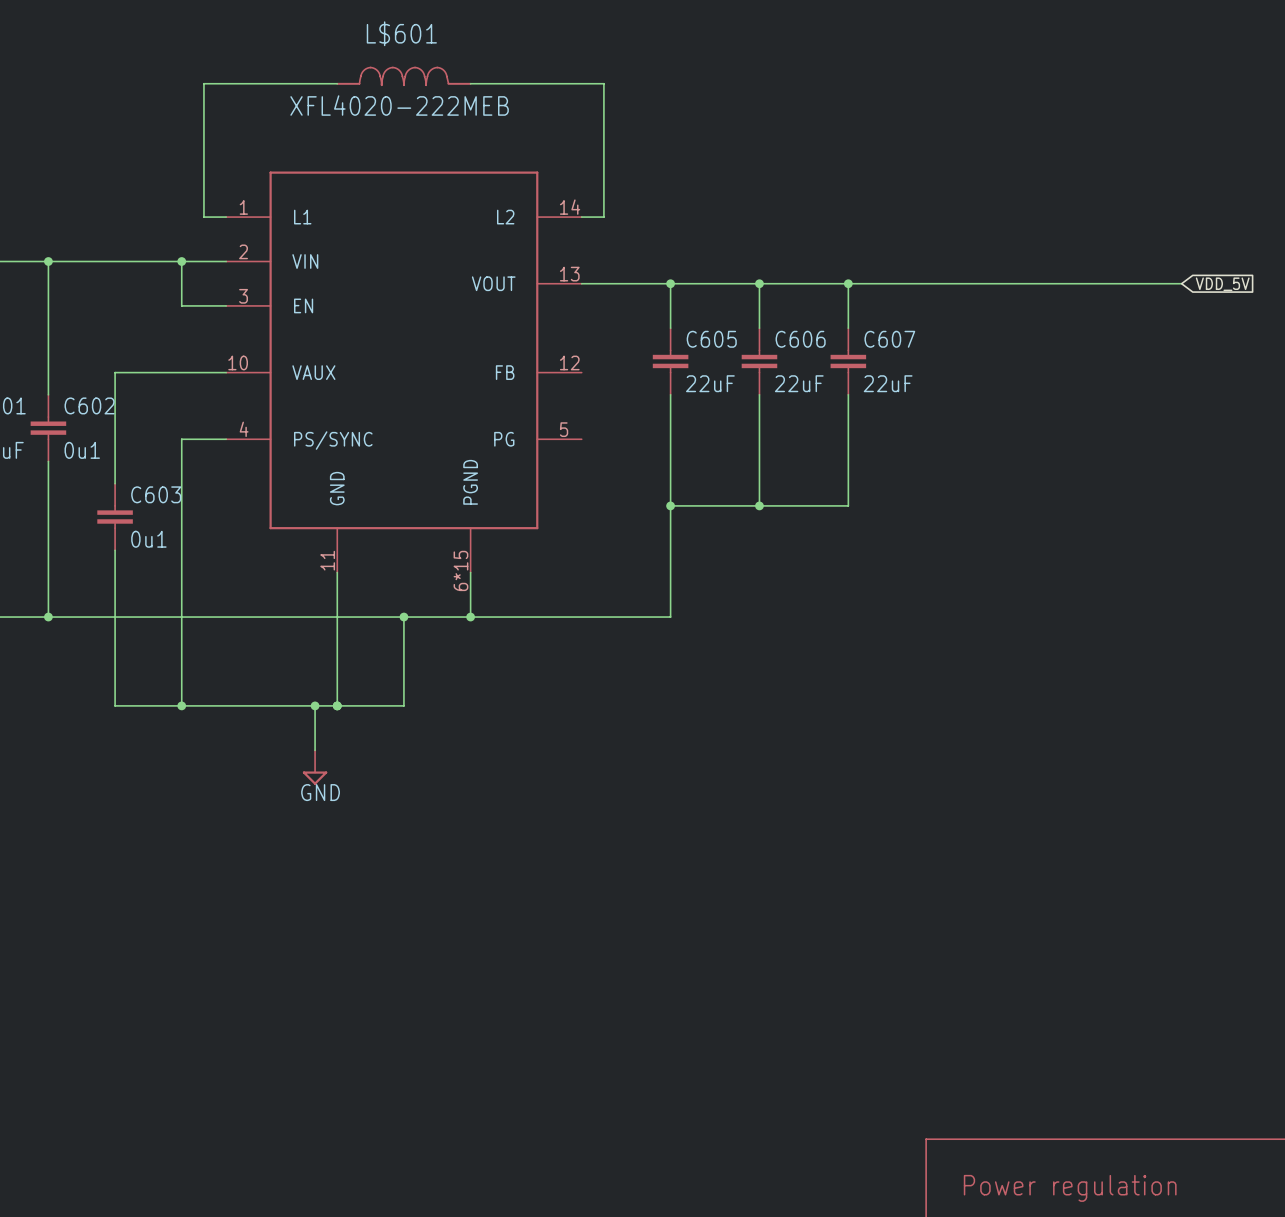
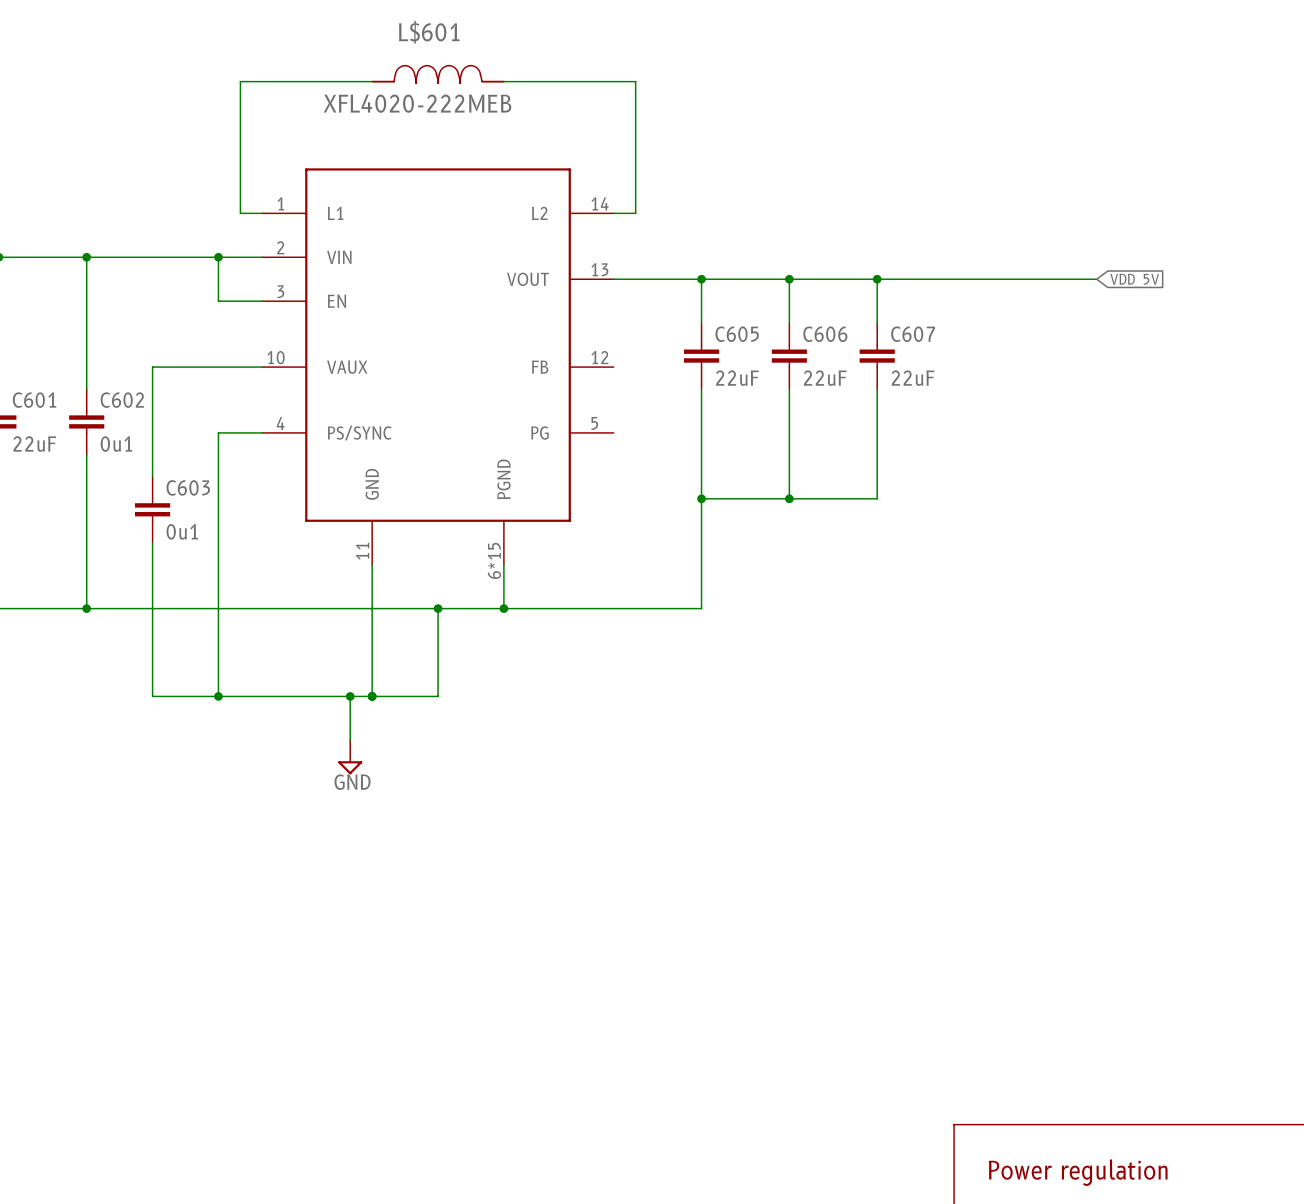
wire: (1070, 283) (1181, 283) -> none
global label position: VDD_5V (1222, 284) -> VDD_5V (1134, 280)

